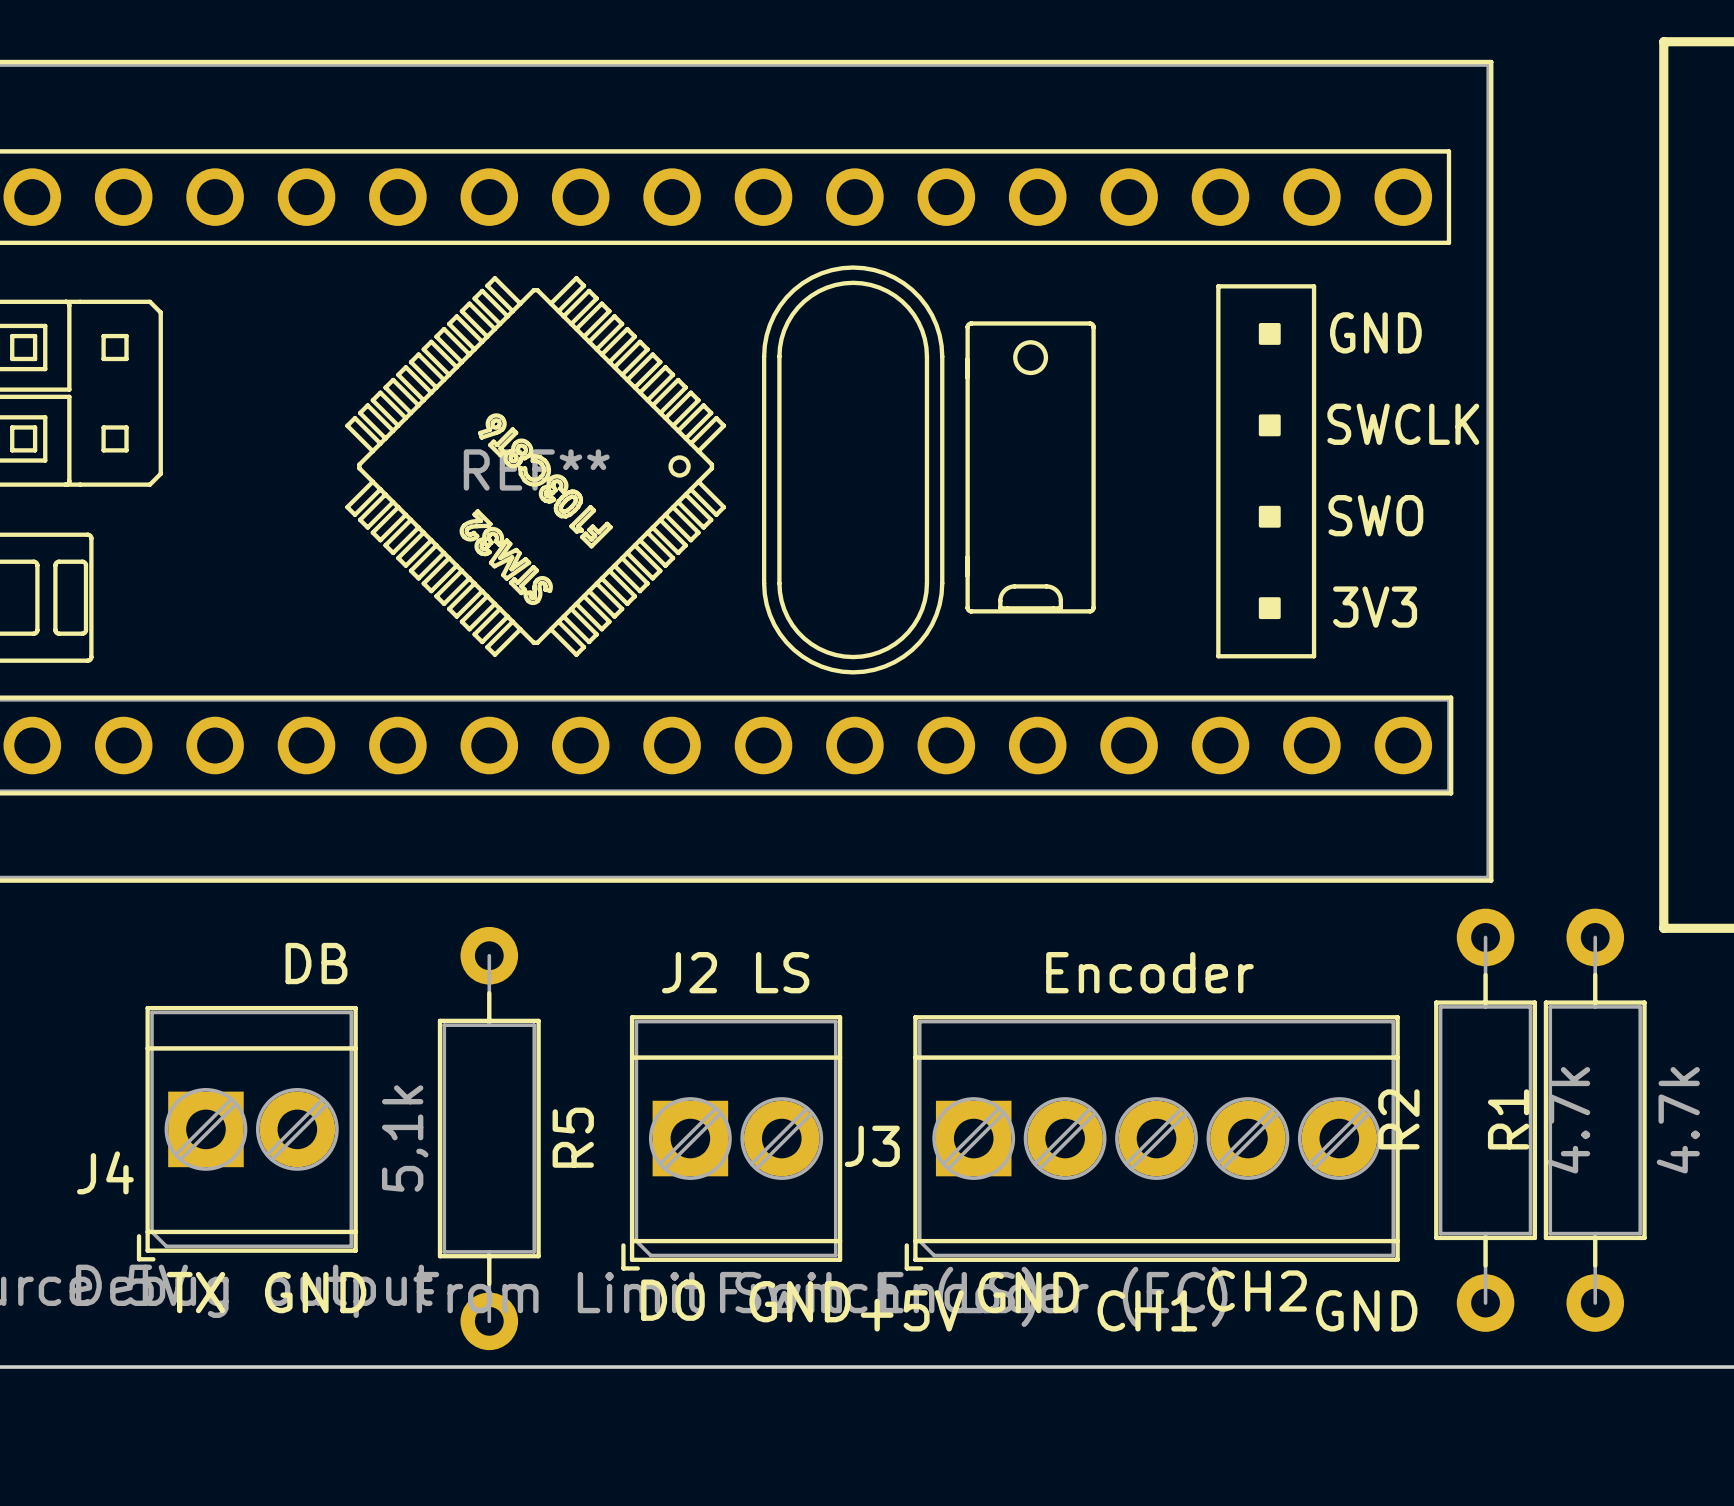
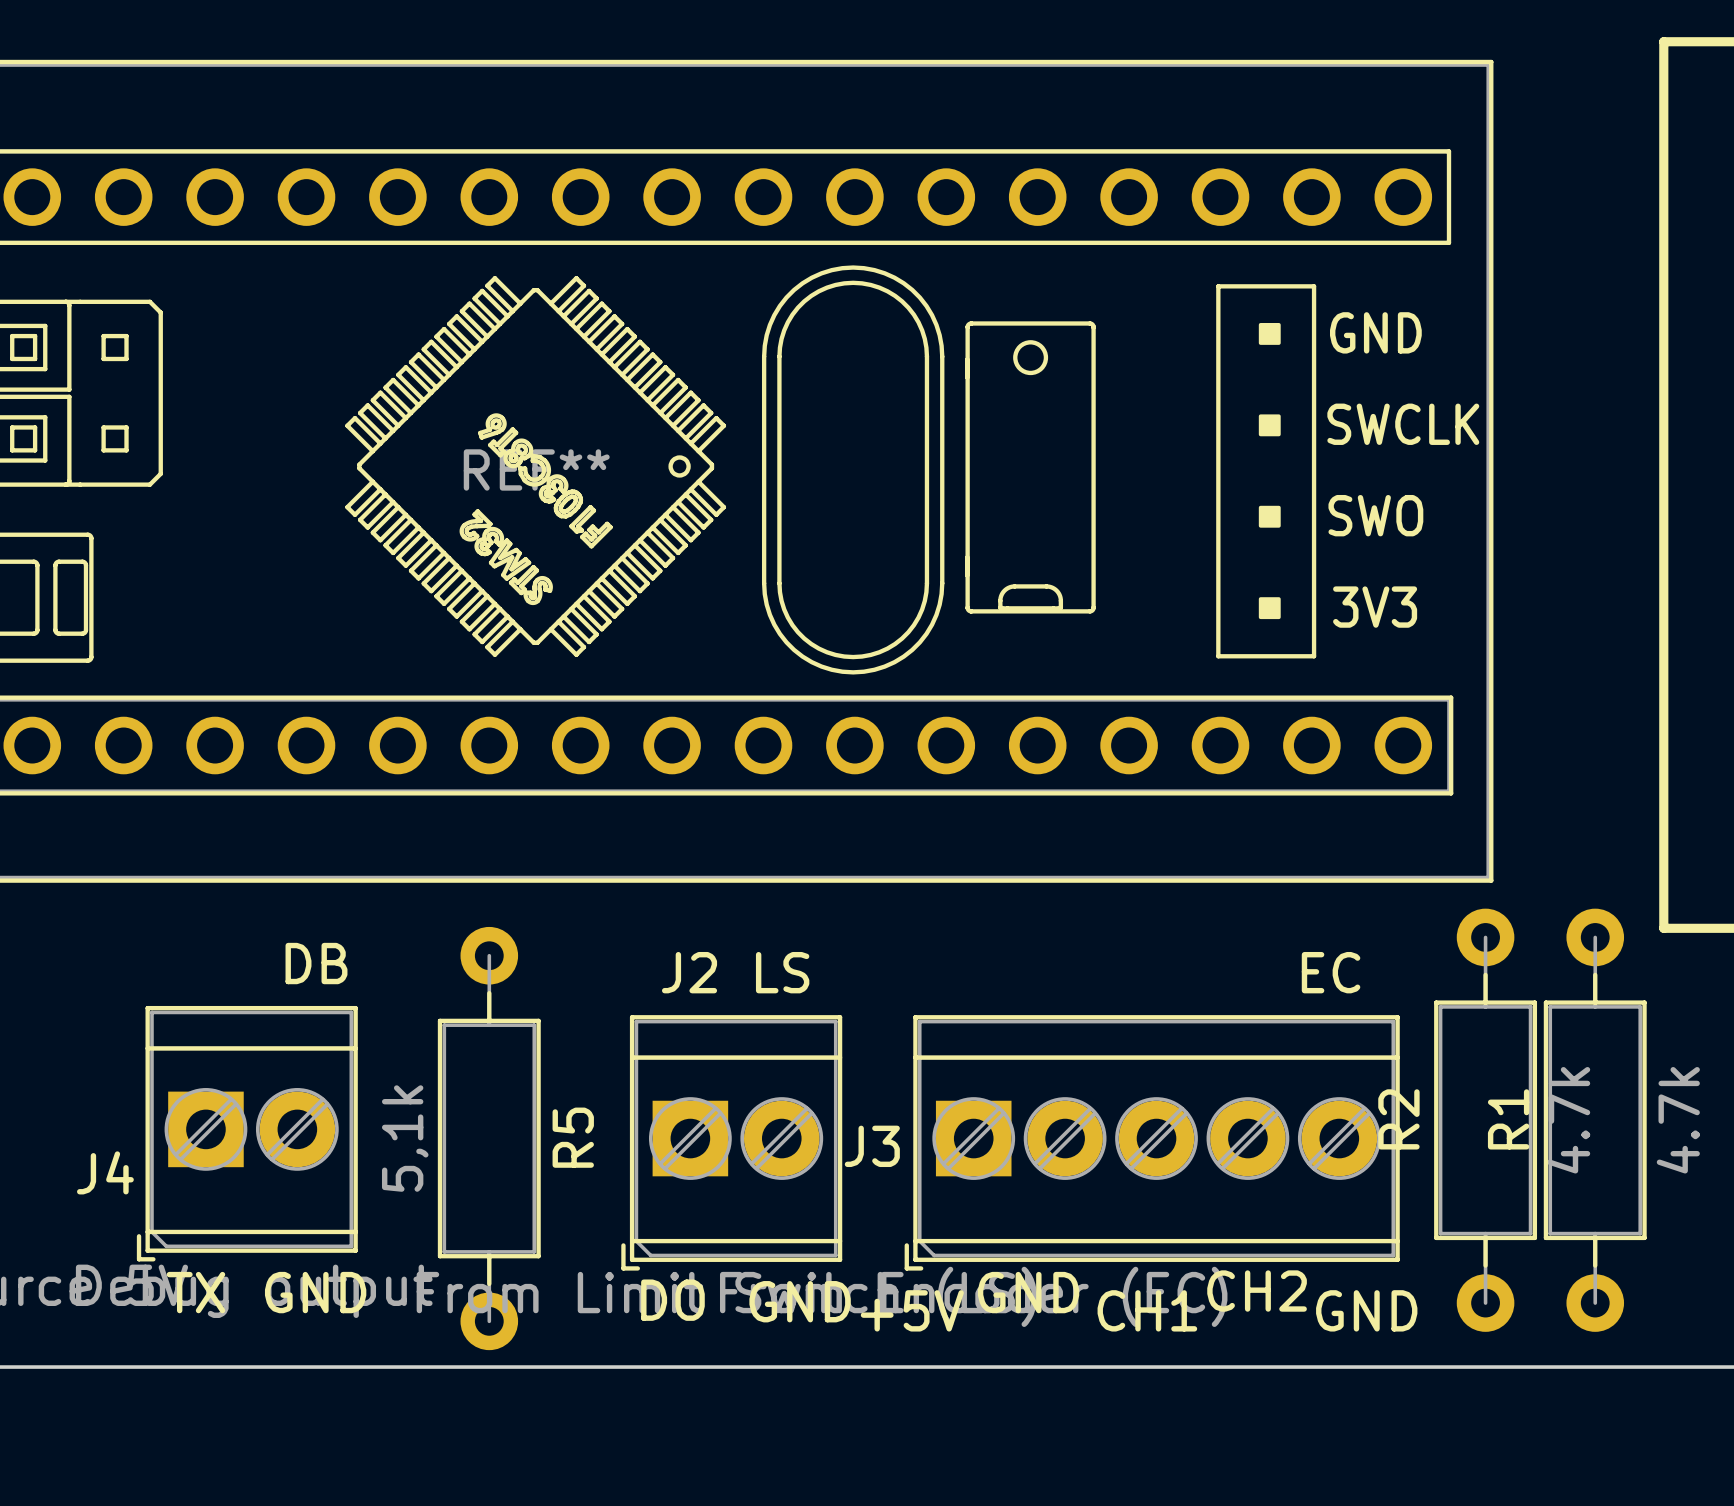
text: Encoder (1149, 972) -> none
text: none -> EC (1331, 972)

